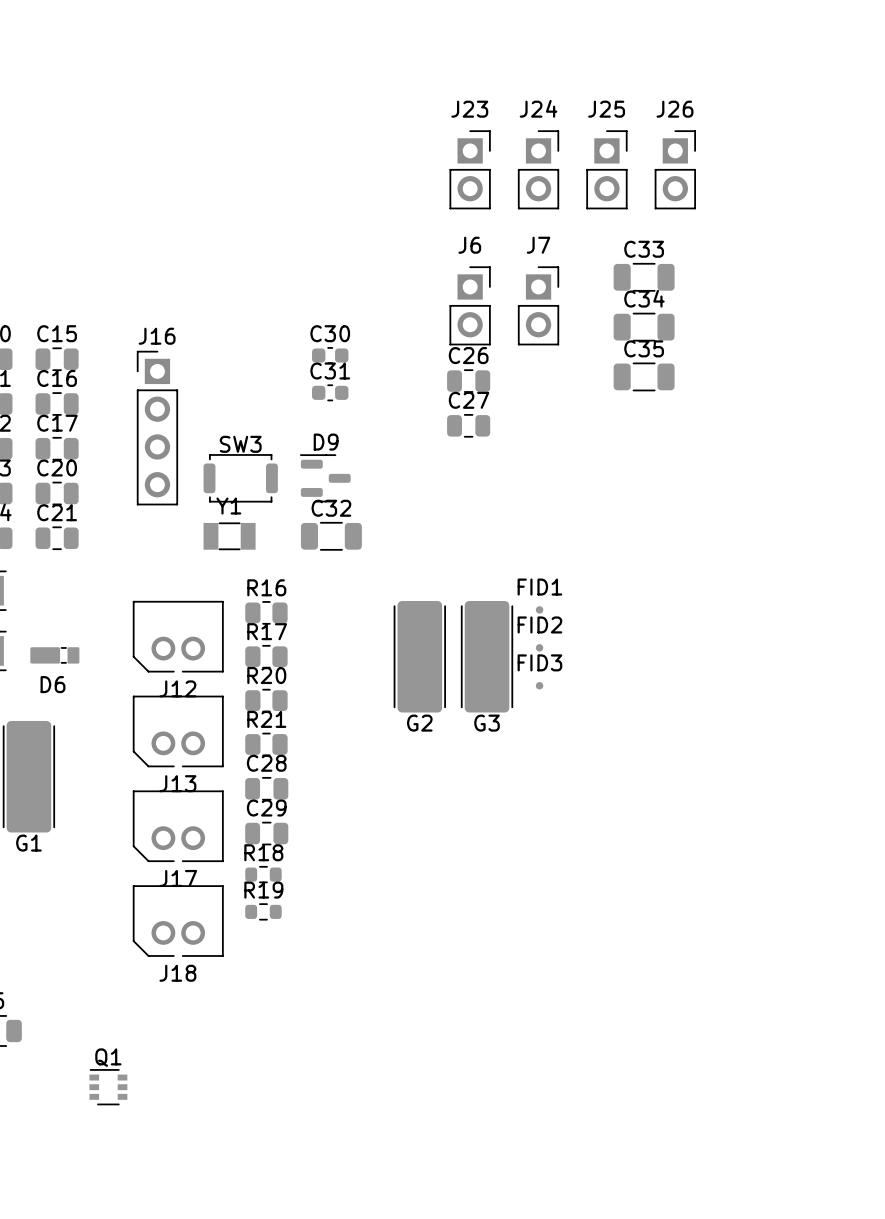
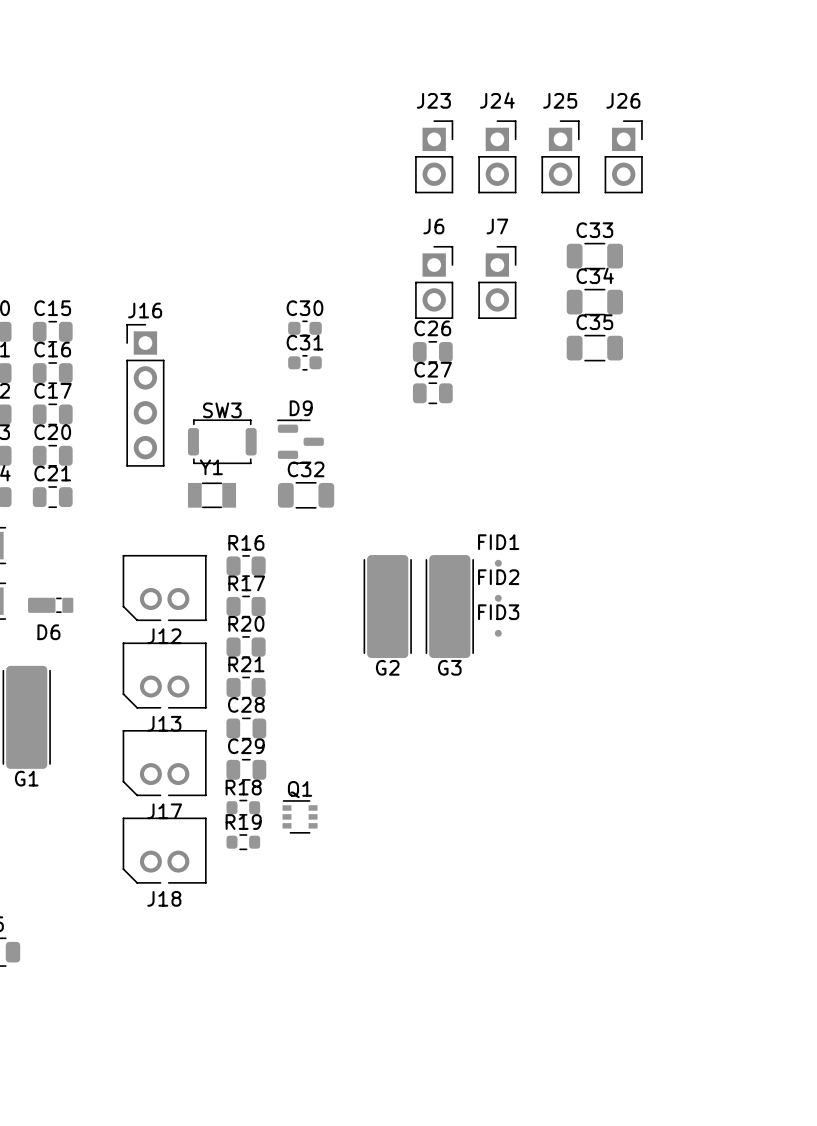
Q1 position: (108, 1087) -> (300, 816)

